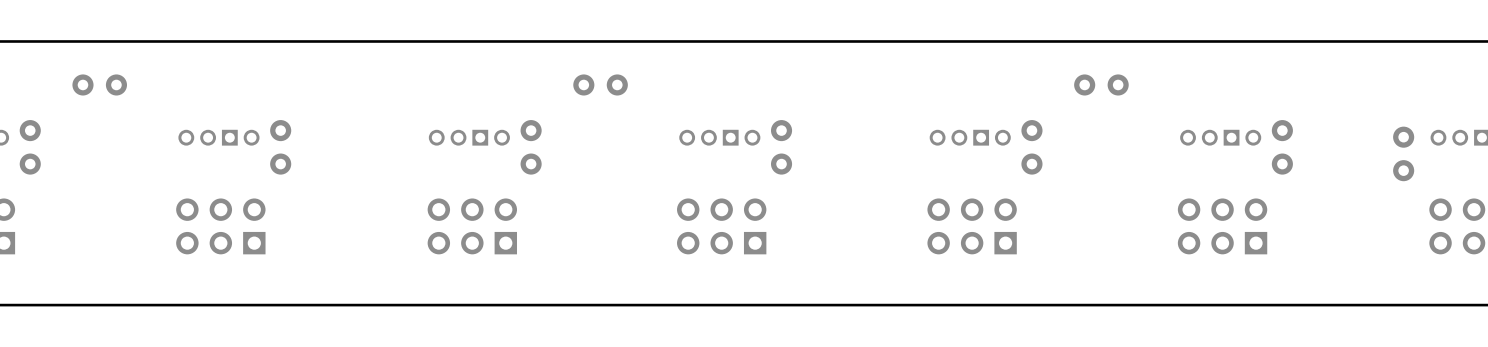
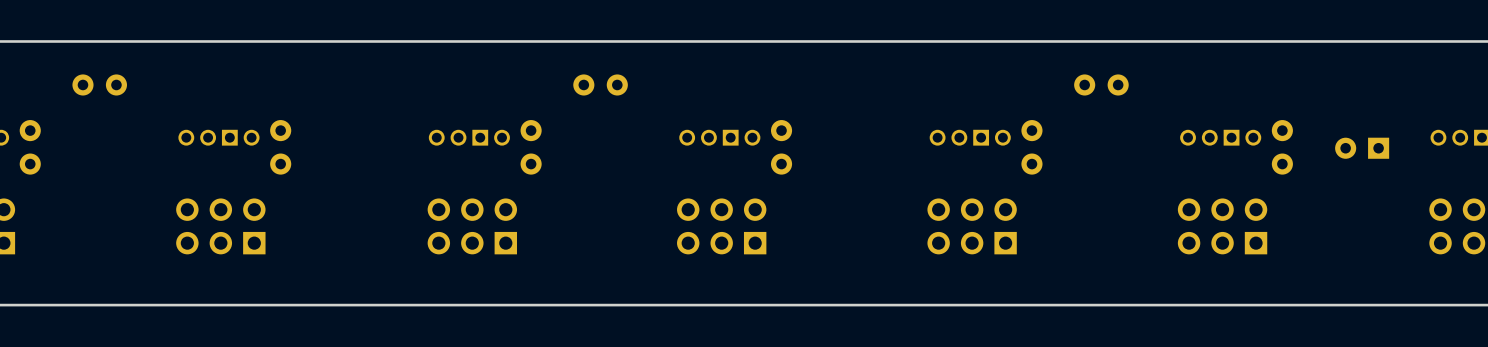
part: none -> (1362, 148)
part: (1403, 153) -> none

